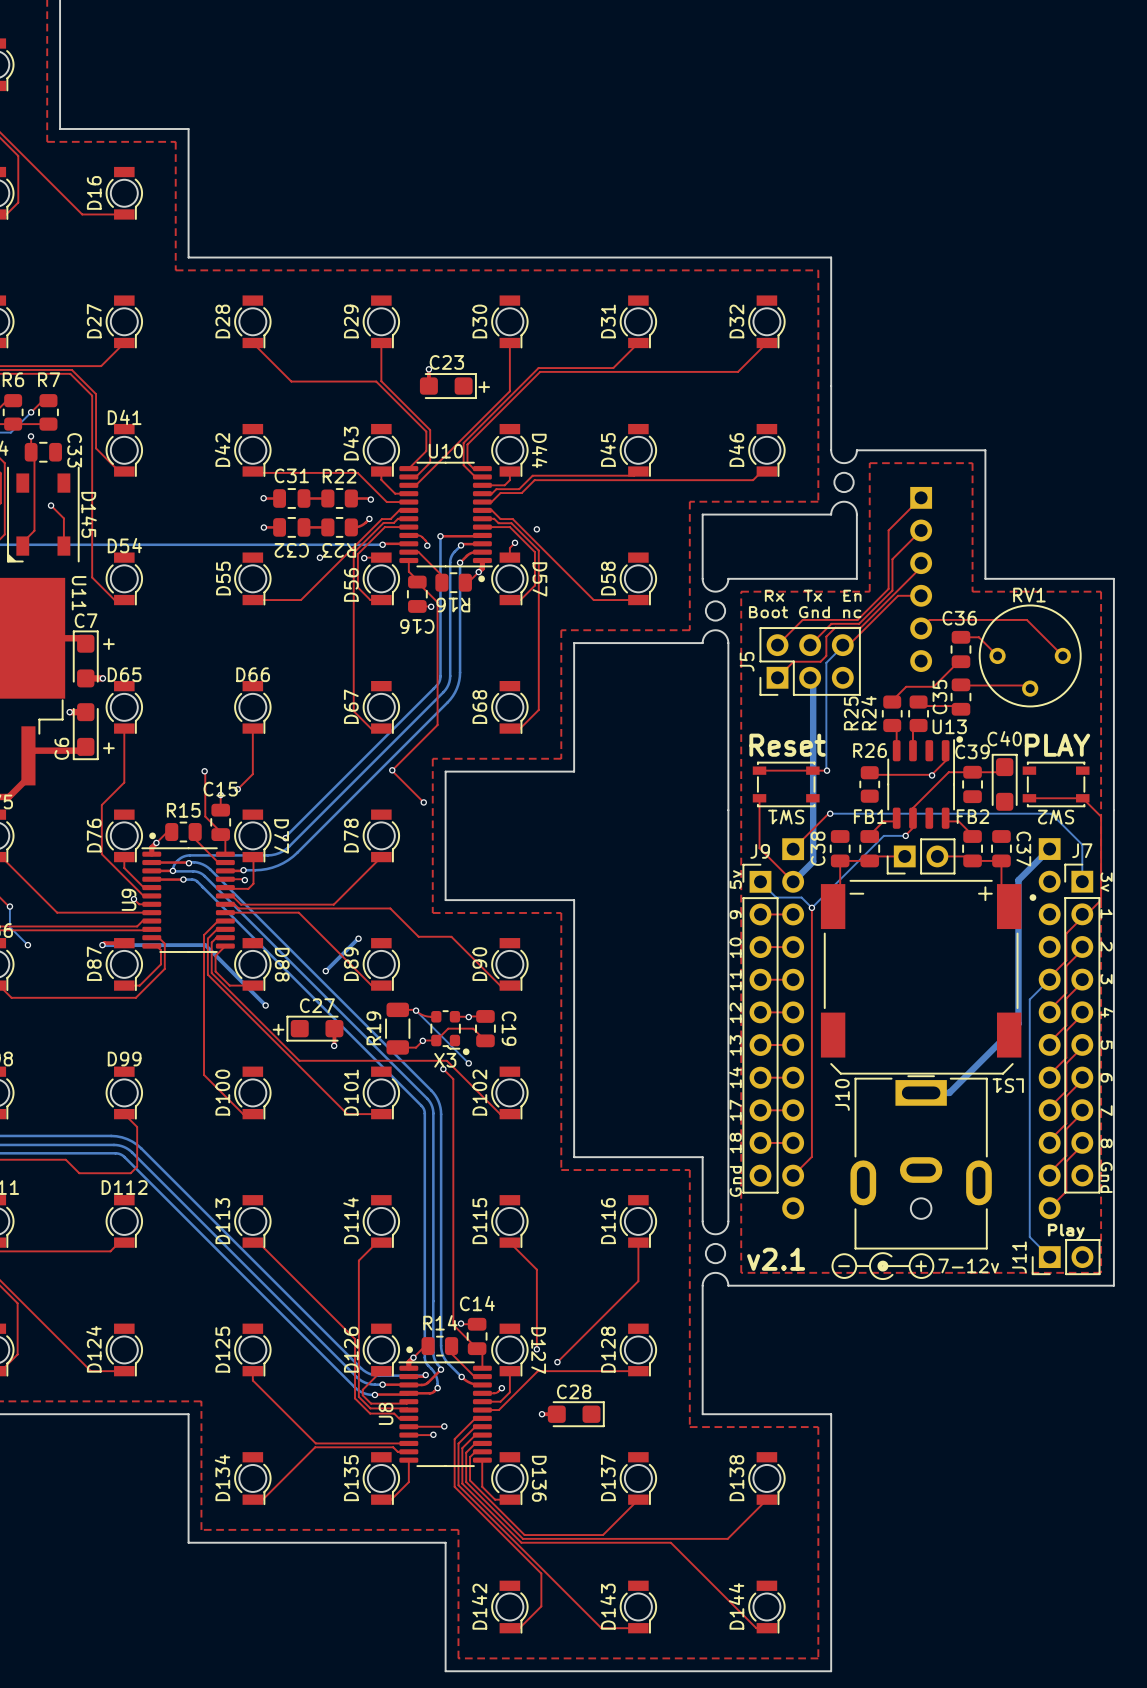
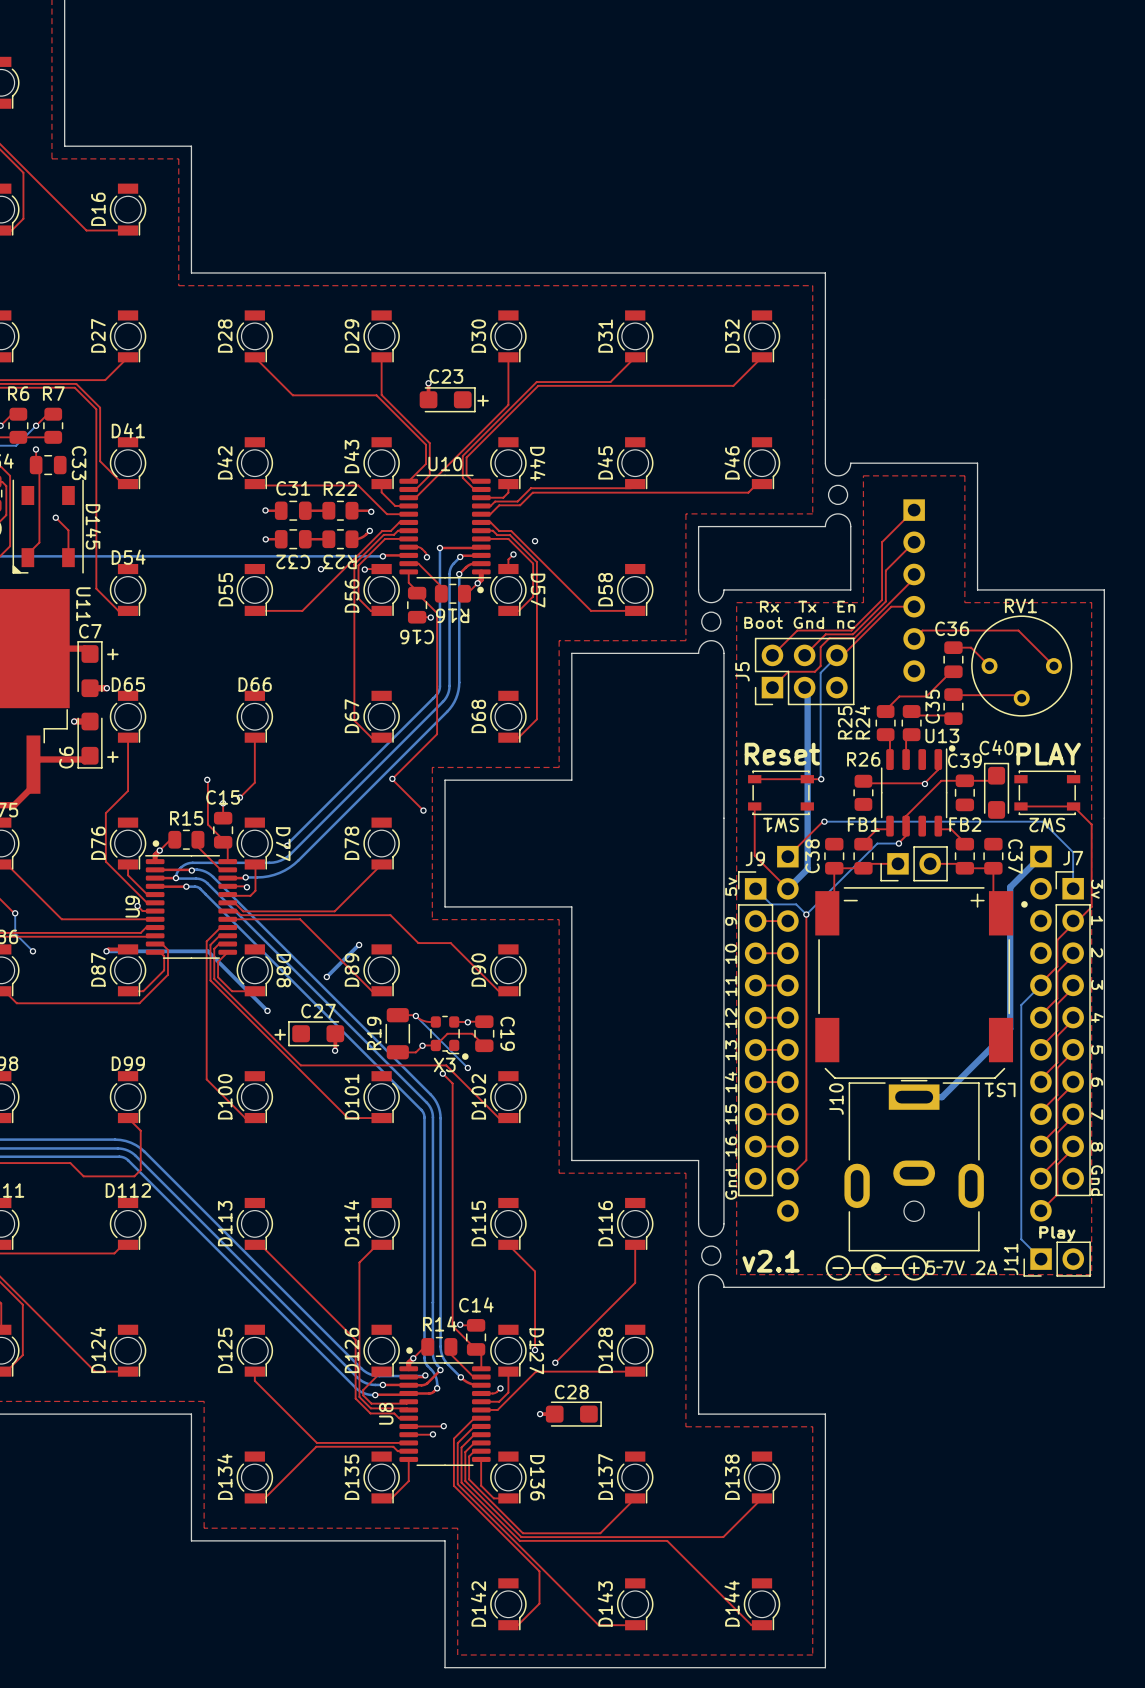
text: Gnd 18 17 14 13 12 11 10 (735, 1067) -> Gnd 16 15 14 13 12 11 10 (730, 1071)
text: none -> 5 (930, 1267)
text: none -> – (939, 1267)
text: 7-12v (968, 1265) -> 7V 2A (970, 1267)

